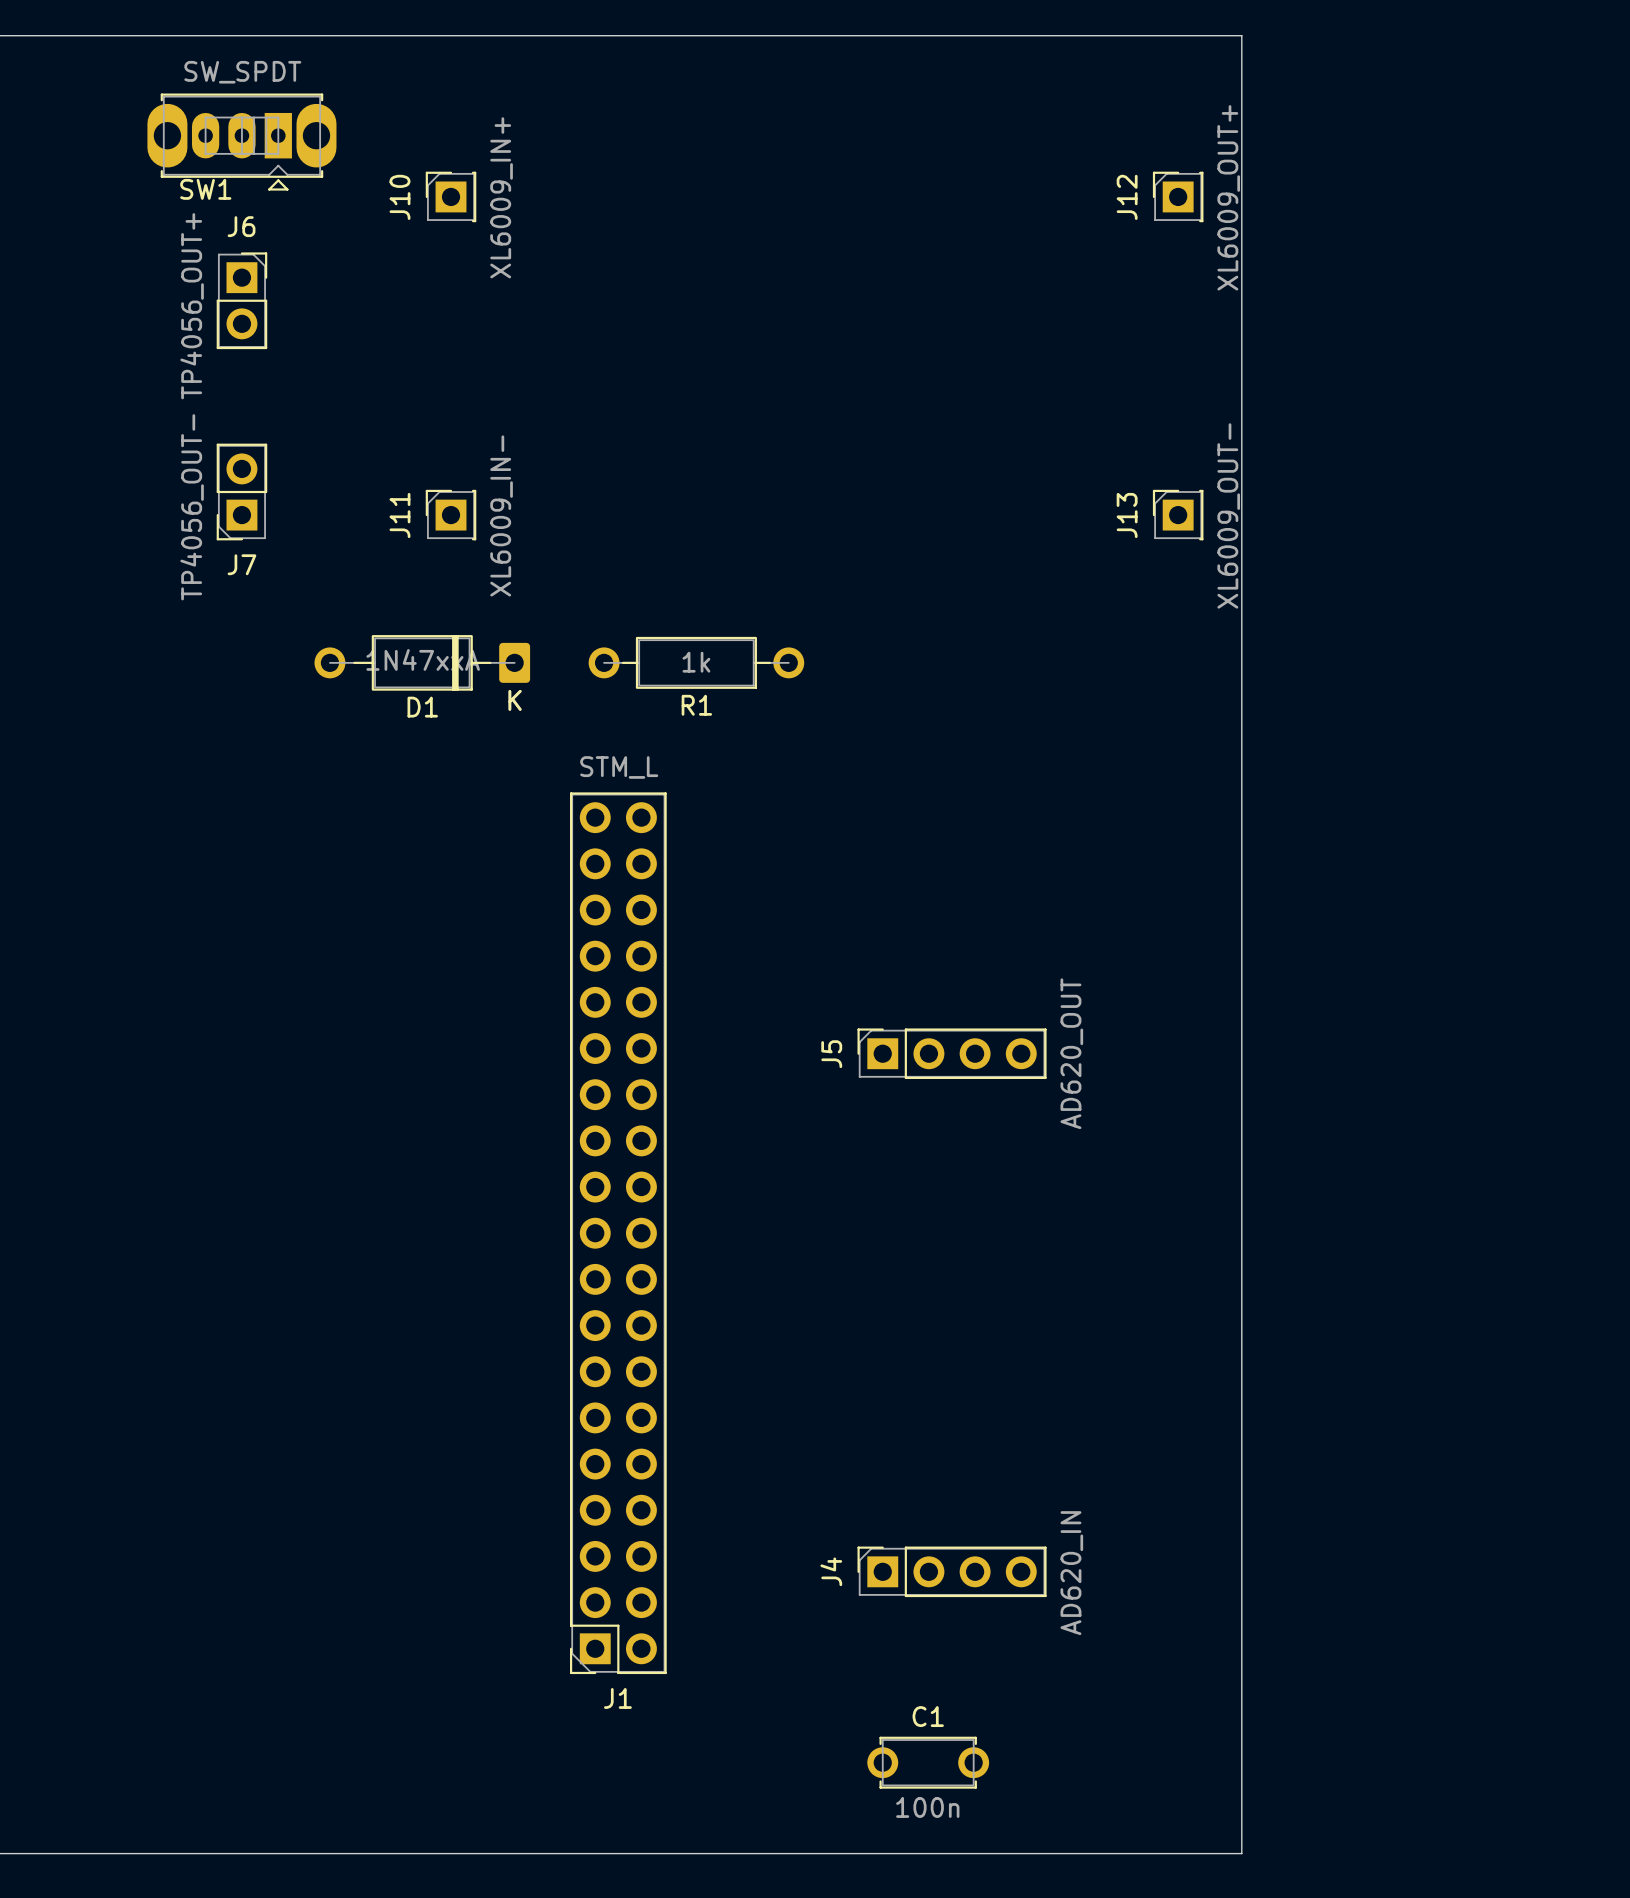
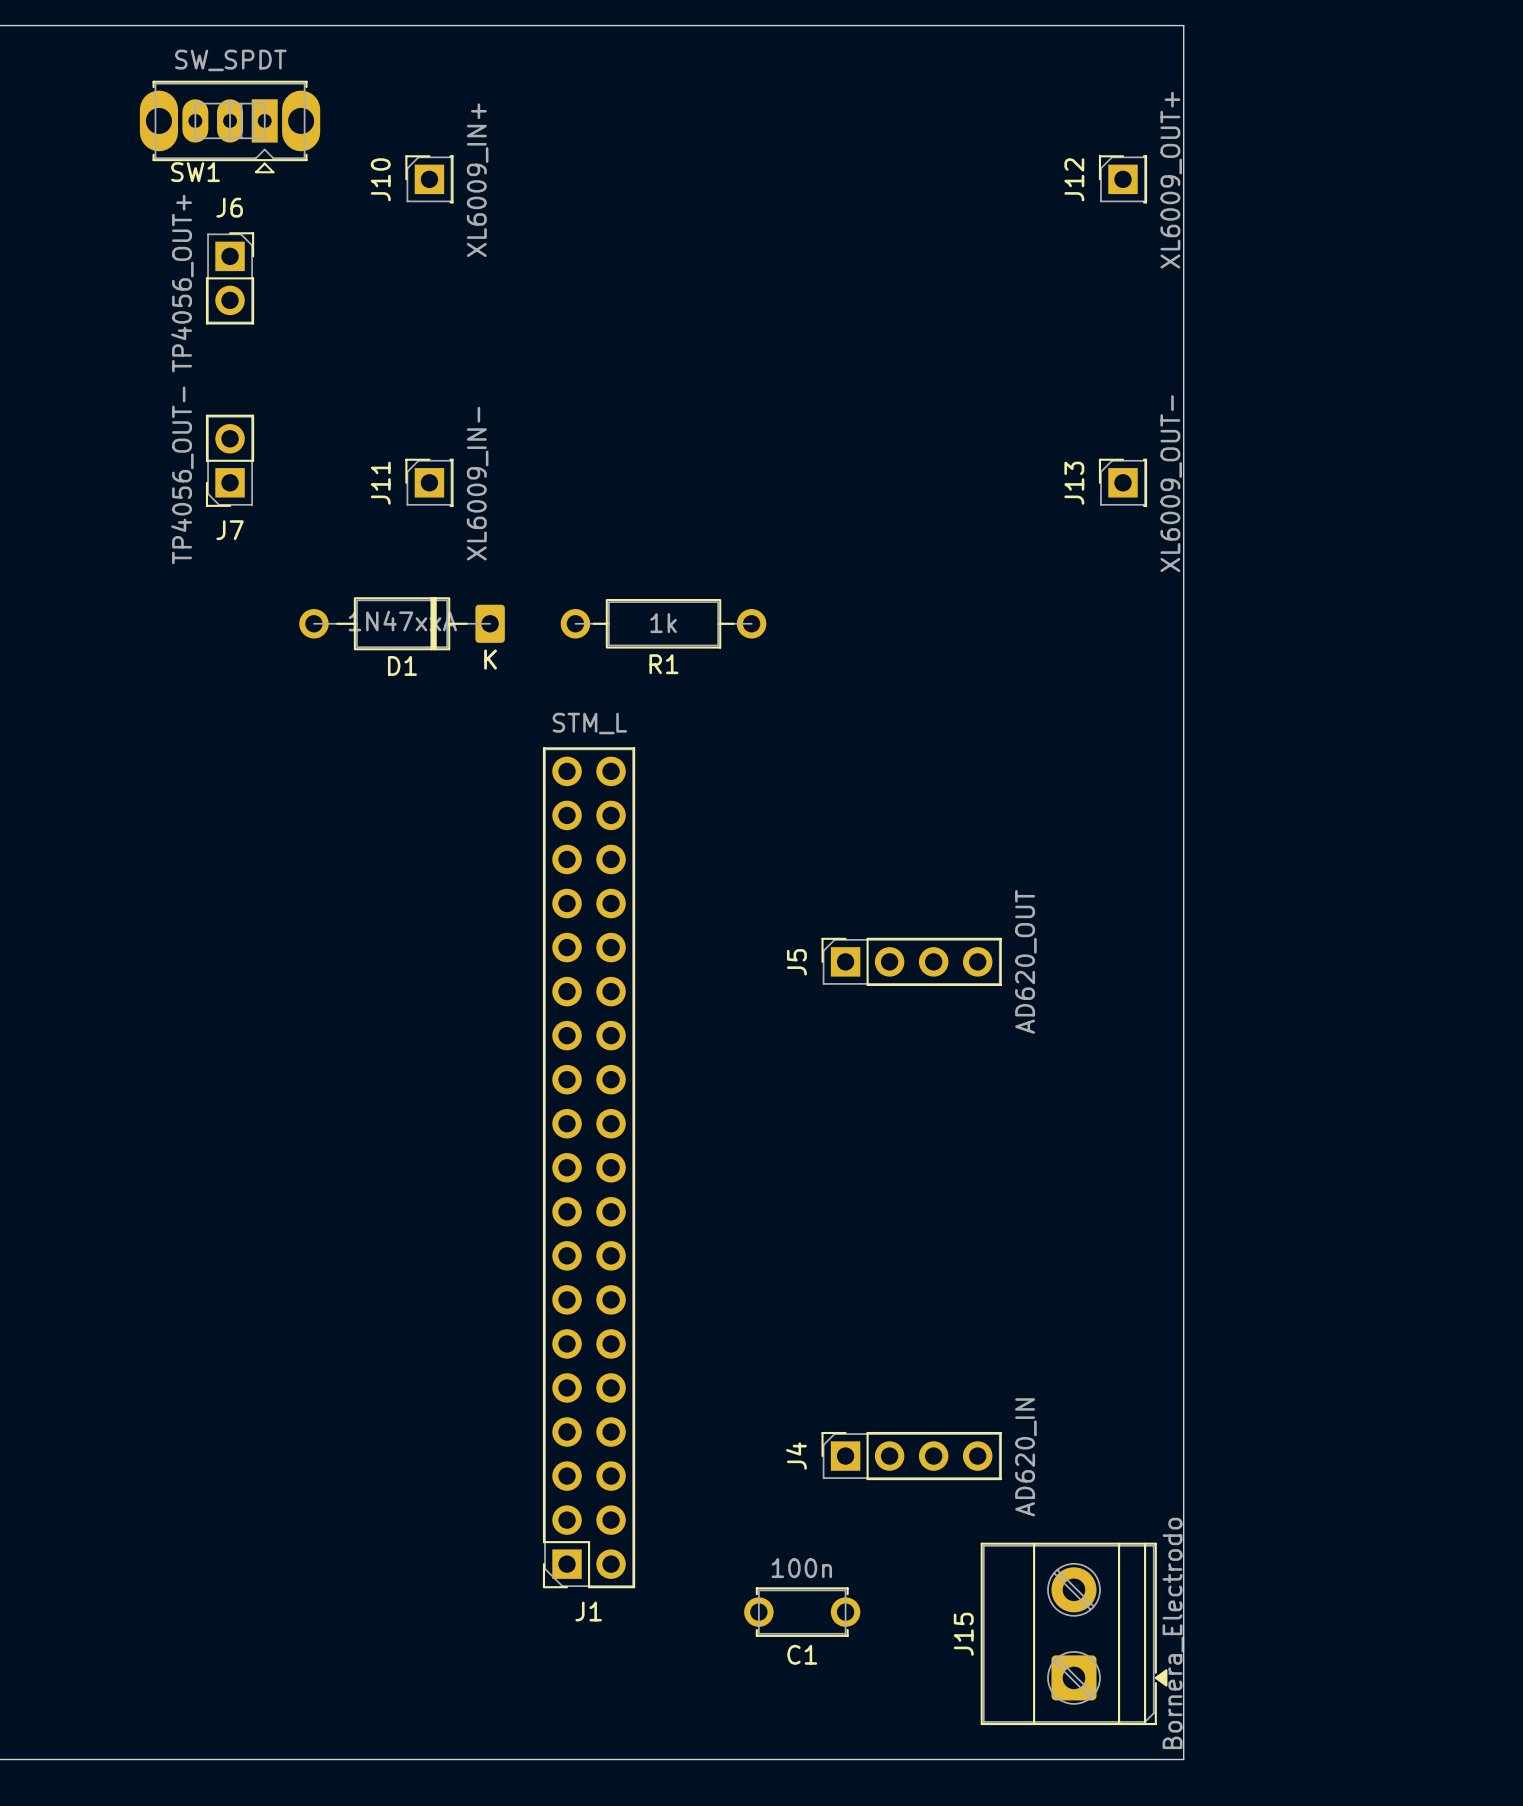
J5 position: (952, 1053) -> (911, 961)
J4 position: (952, 1571) -> (911, 1456)
C1 name position: C1 (928, 1716) -> C1 (802, 1654)
J15: none -> Bornera_Electrodo (1074, 1633)
C1 position: (928, 1762) -> (802, 1612)
C1 value position: 100n (927, 1807) -> 100n (801, 1568)

